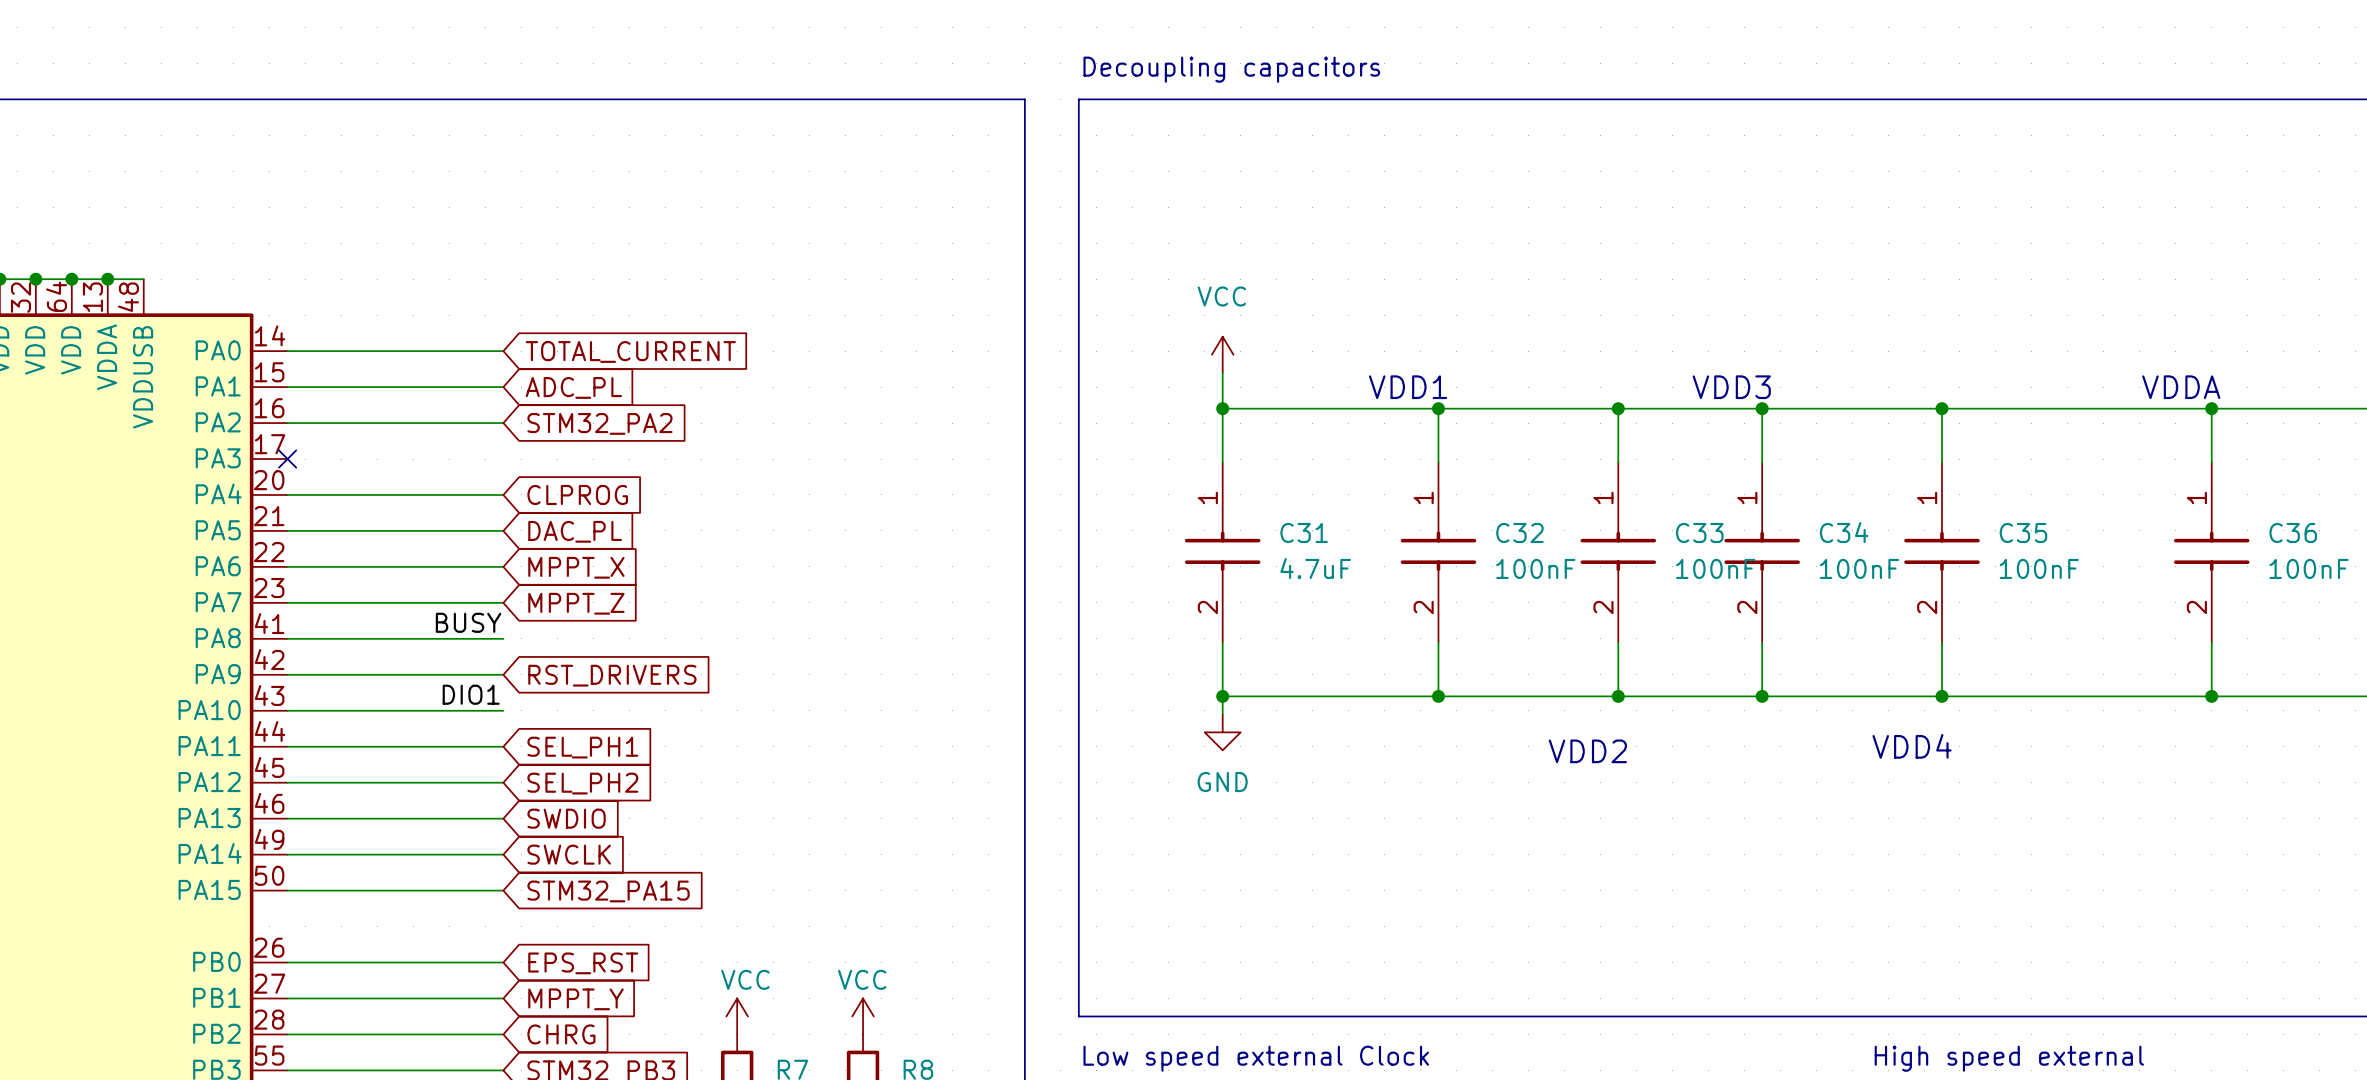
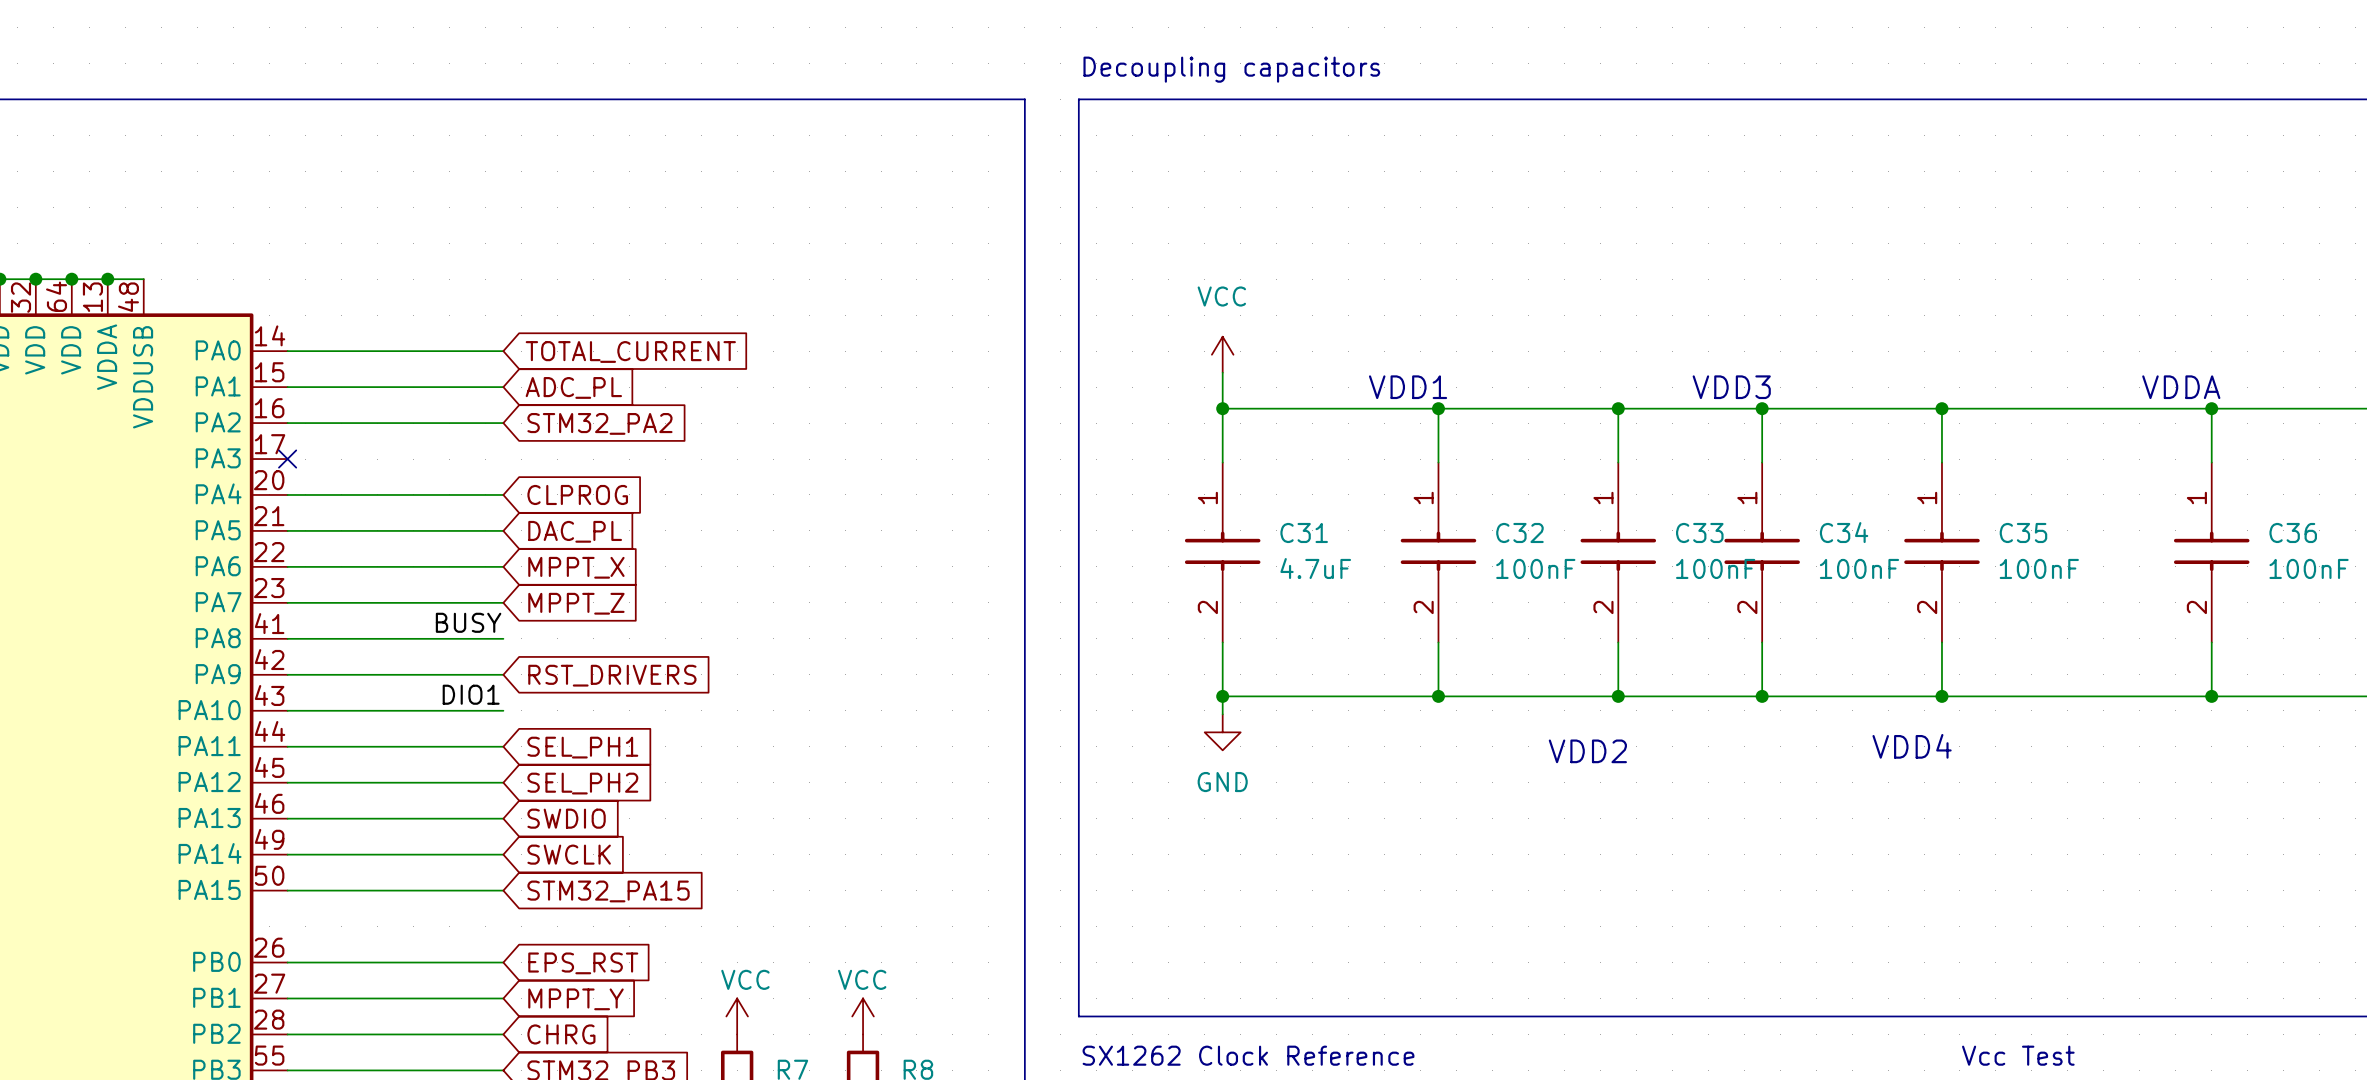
text: none -> Vcc Test (2018, 1055)
text: Low speed external Clock (1256, 1058) -> SX1262 Clock Reference (1248, 1055)
text: High speed external (2009, 1058) -> none

